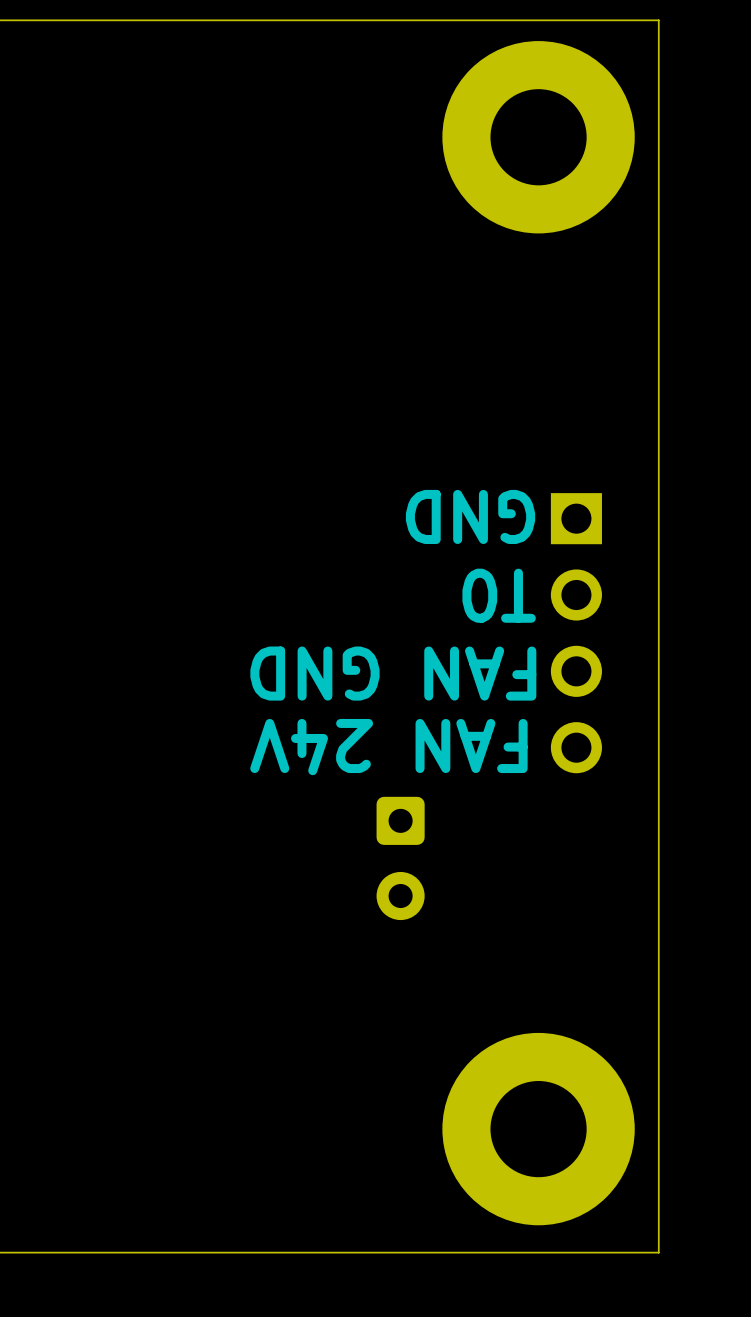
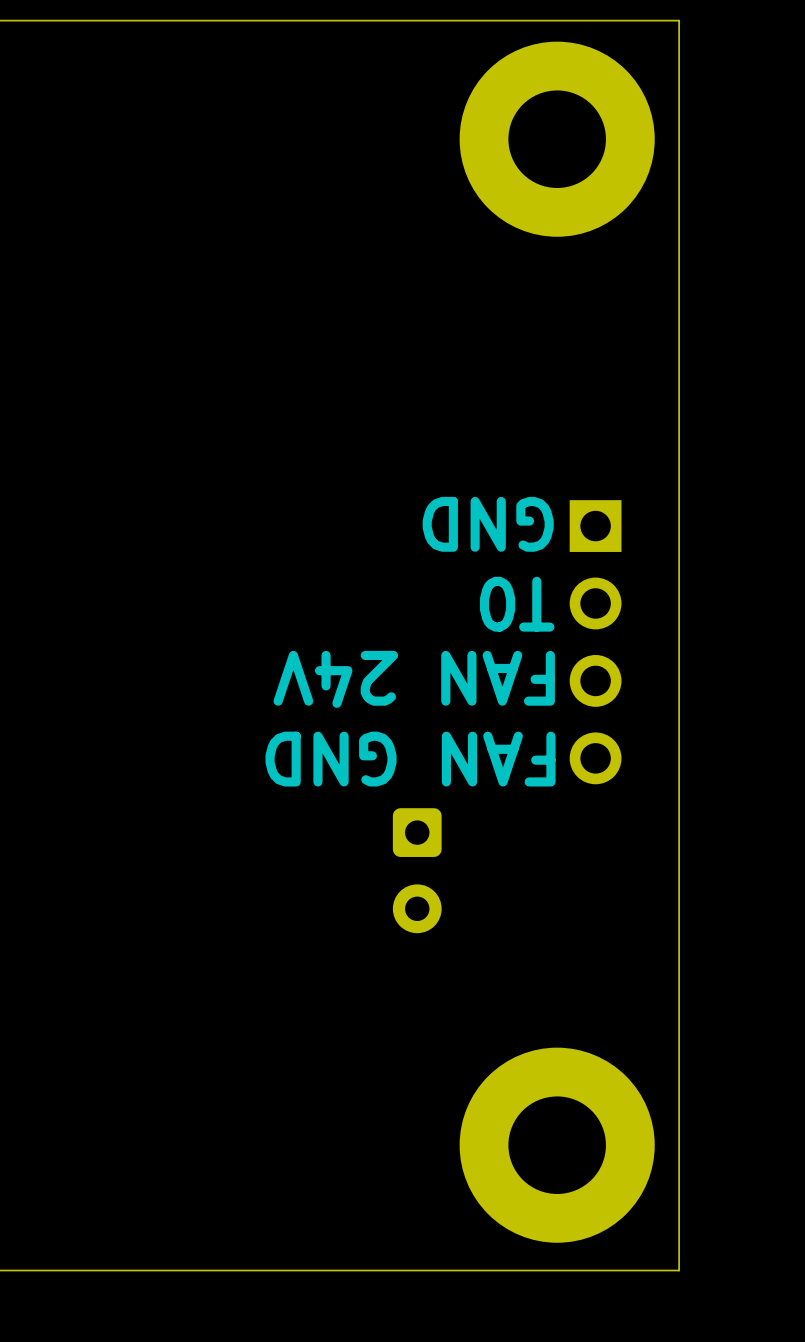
text: FAN GND (393, 673) -> FAN 24V (414, 679)
text: FAN 24V (388, 747) -> FAN GND (410, 759)

